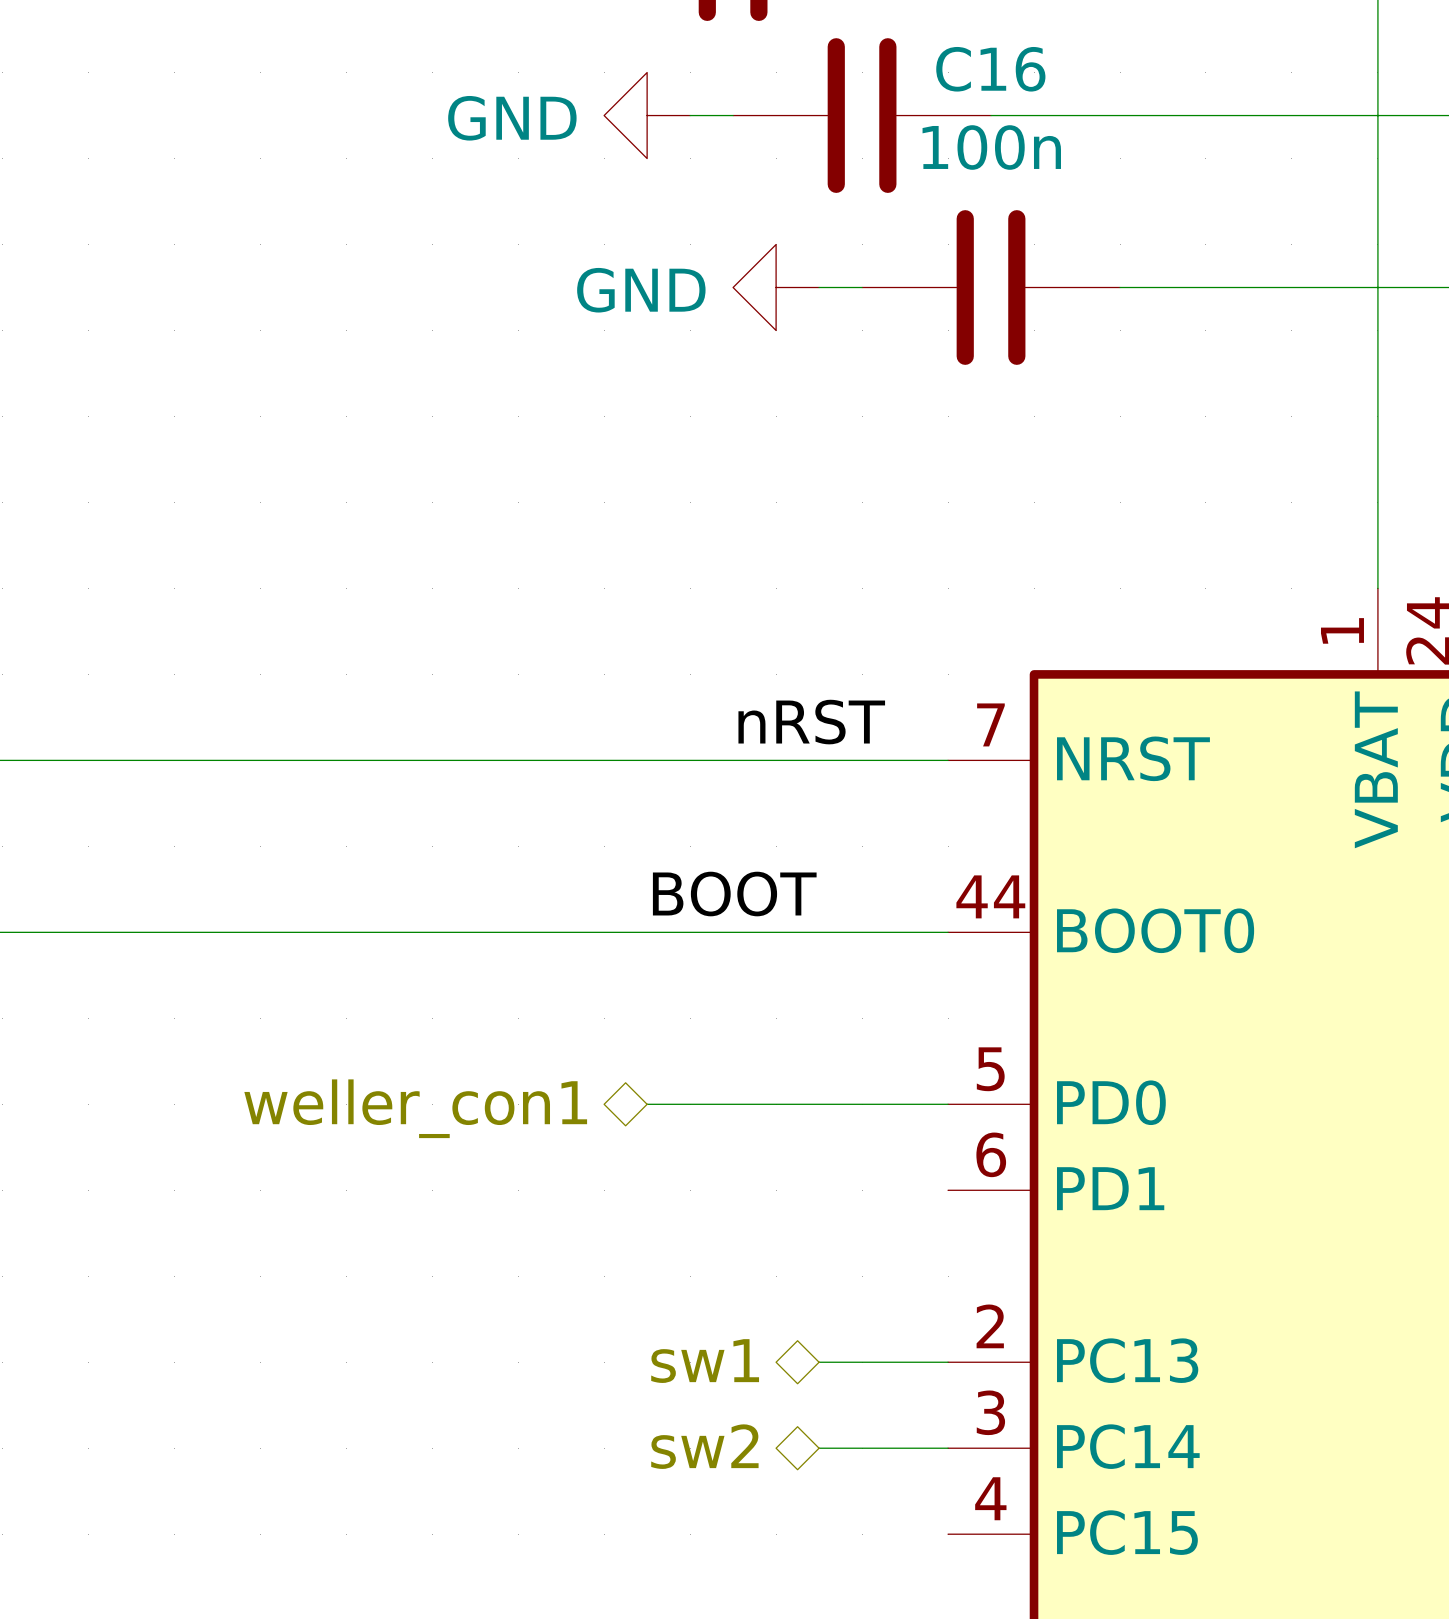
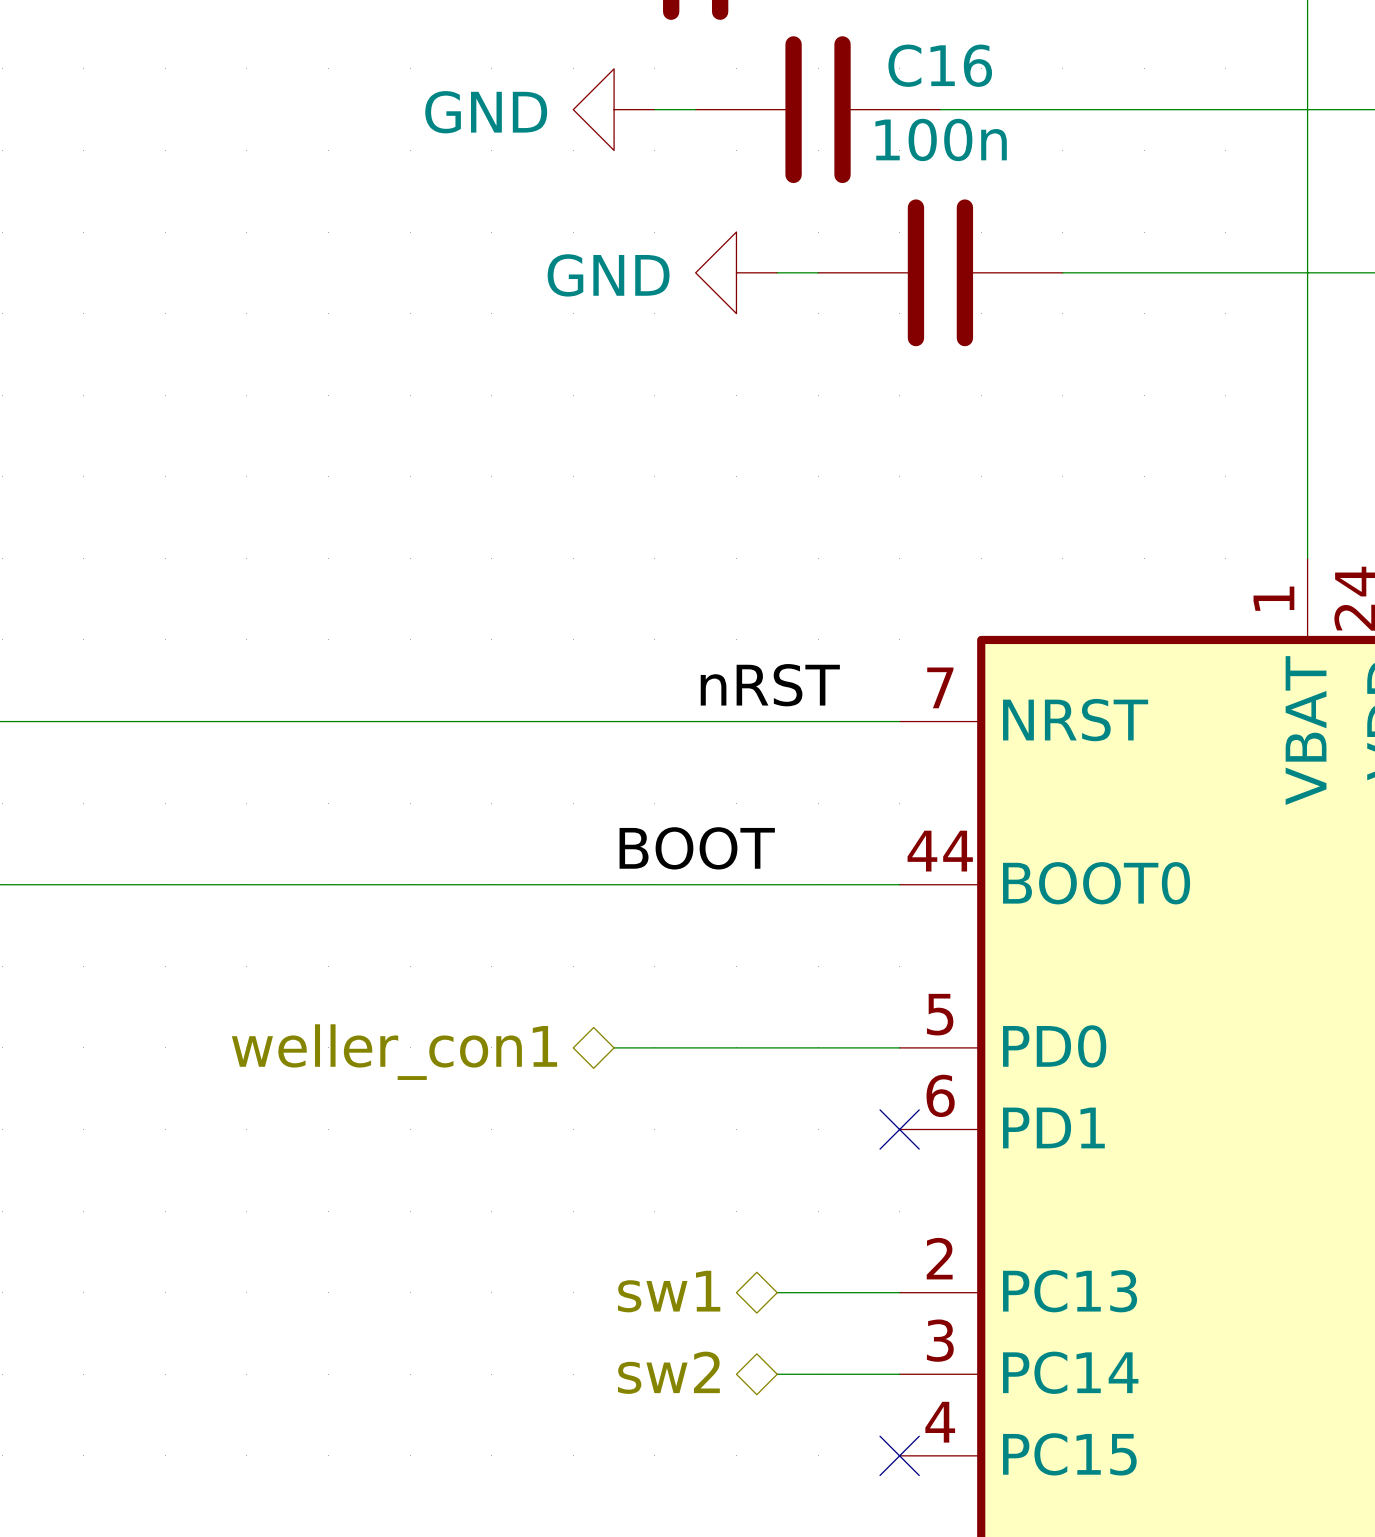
no-connect mark: none -> (899, 1129)
no-connect mark: none -> (899, 1455)

